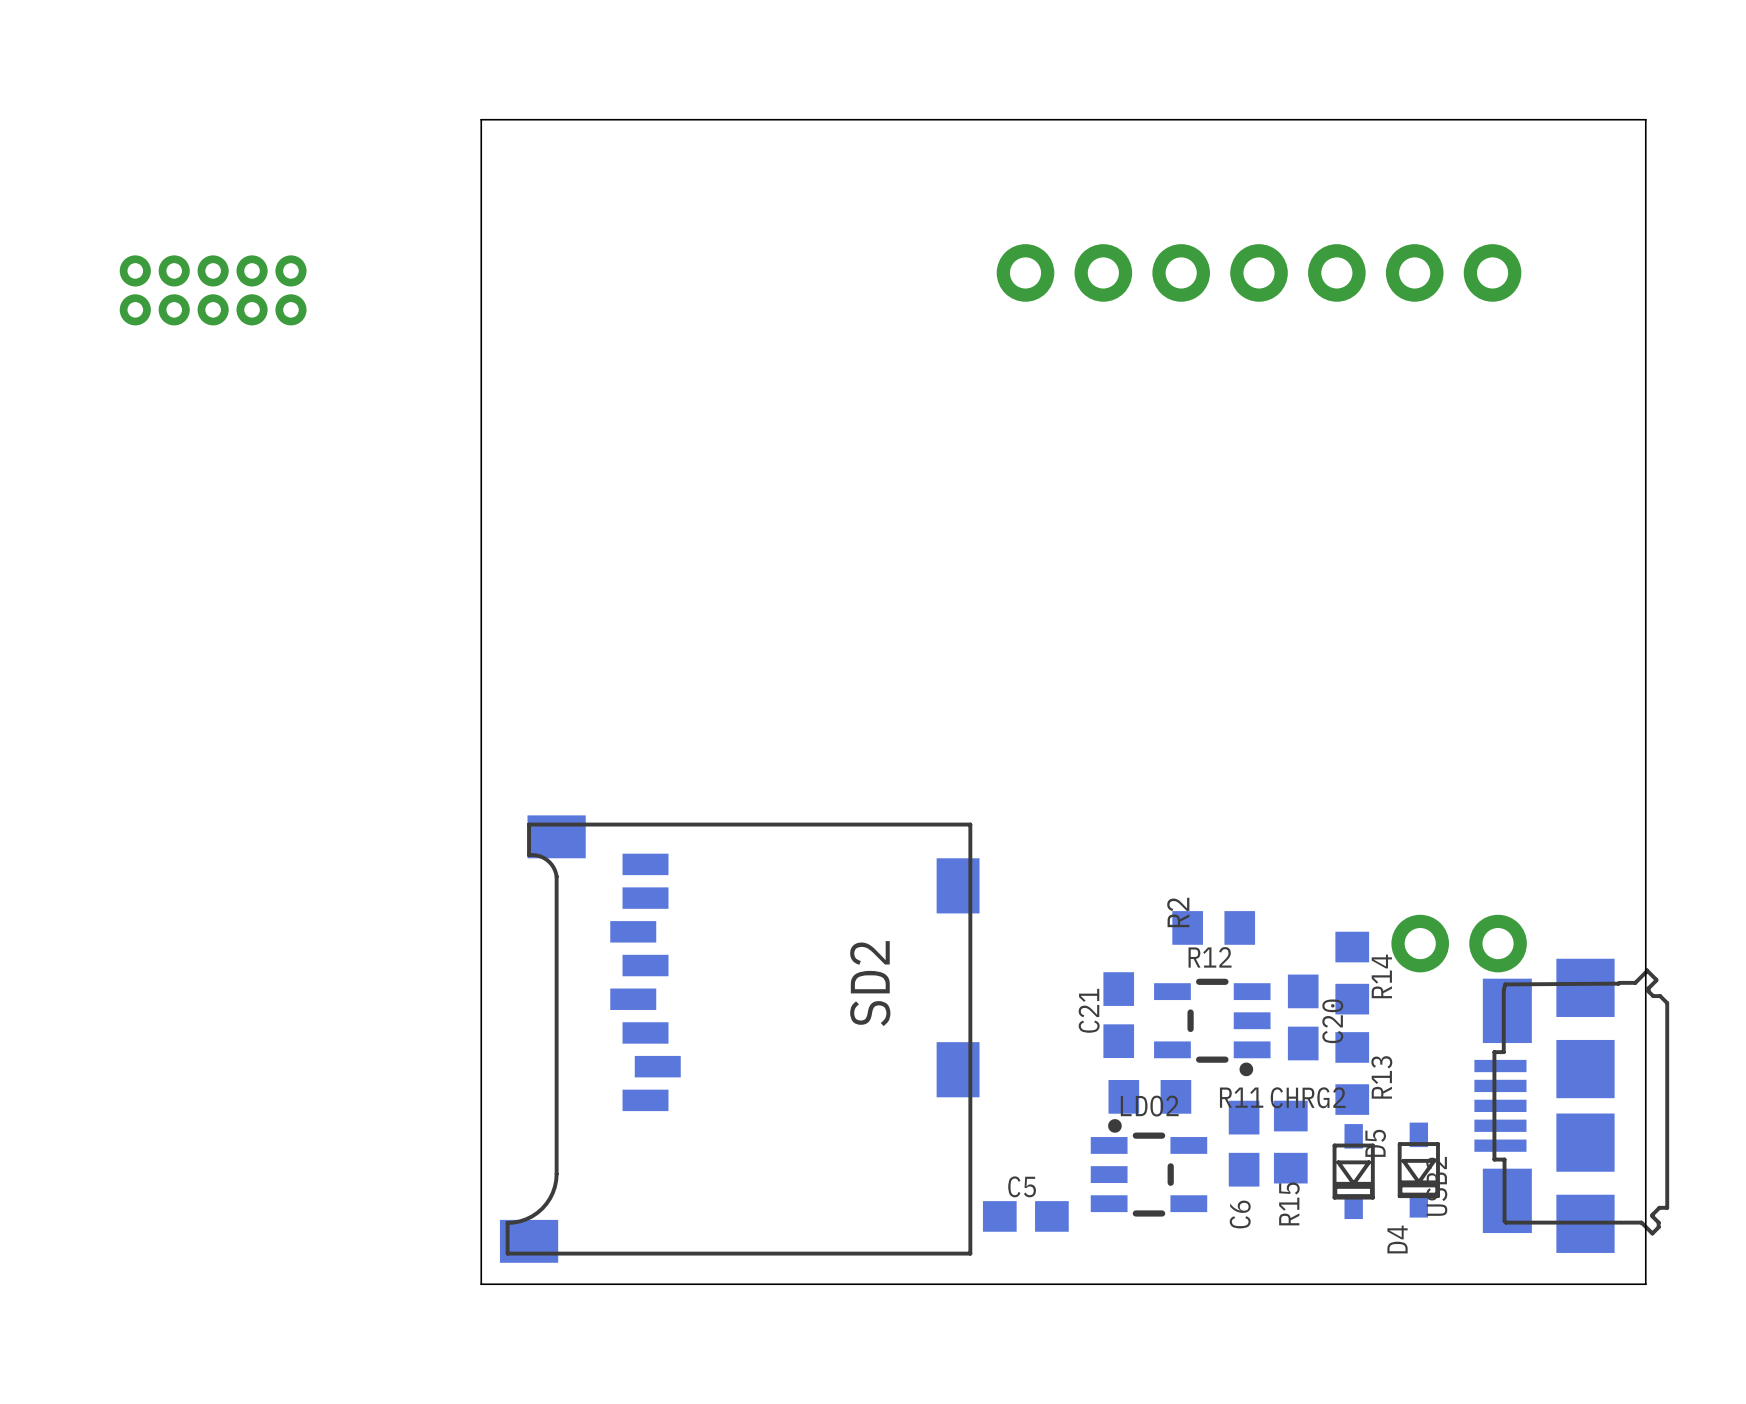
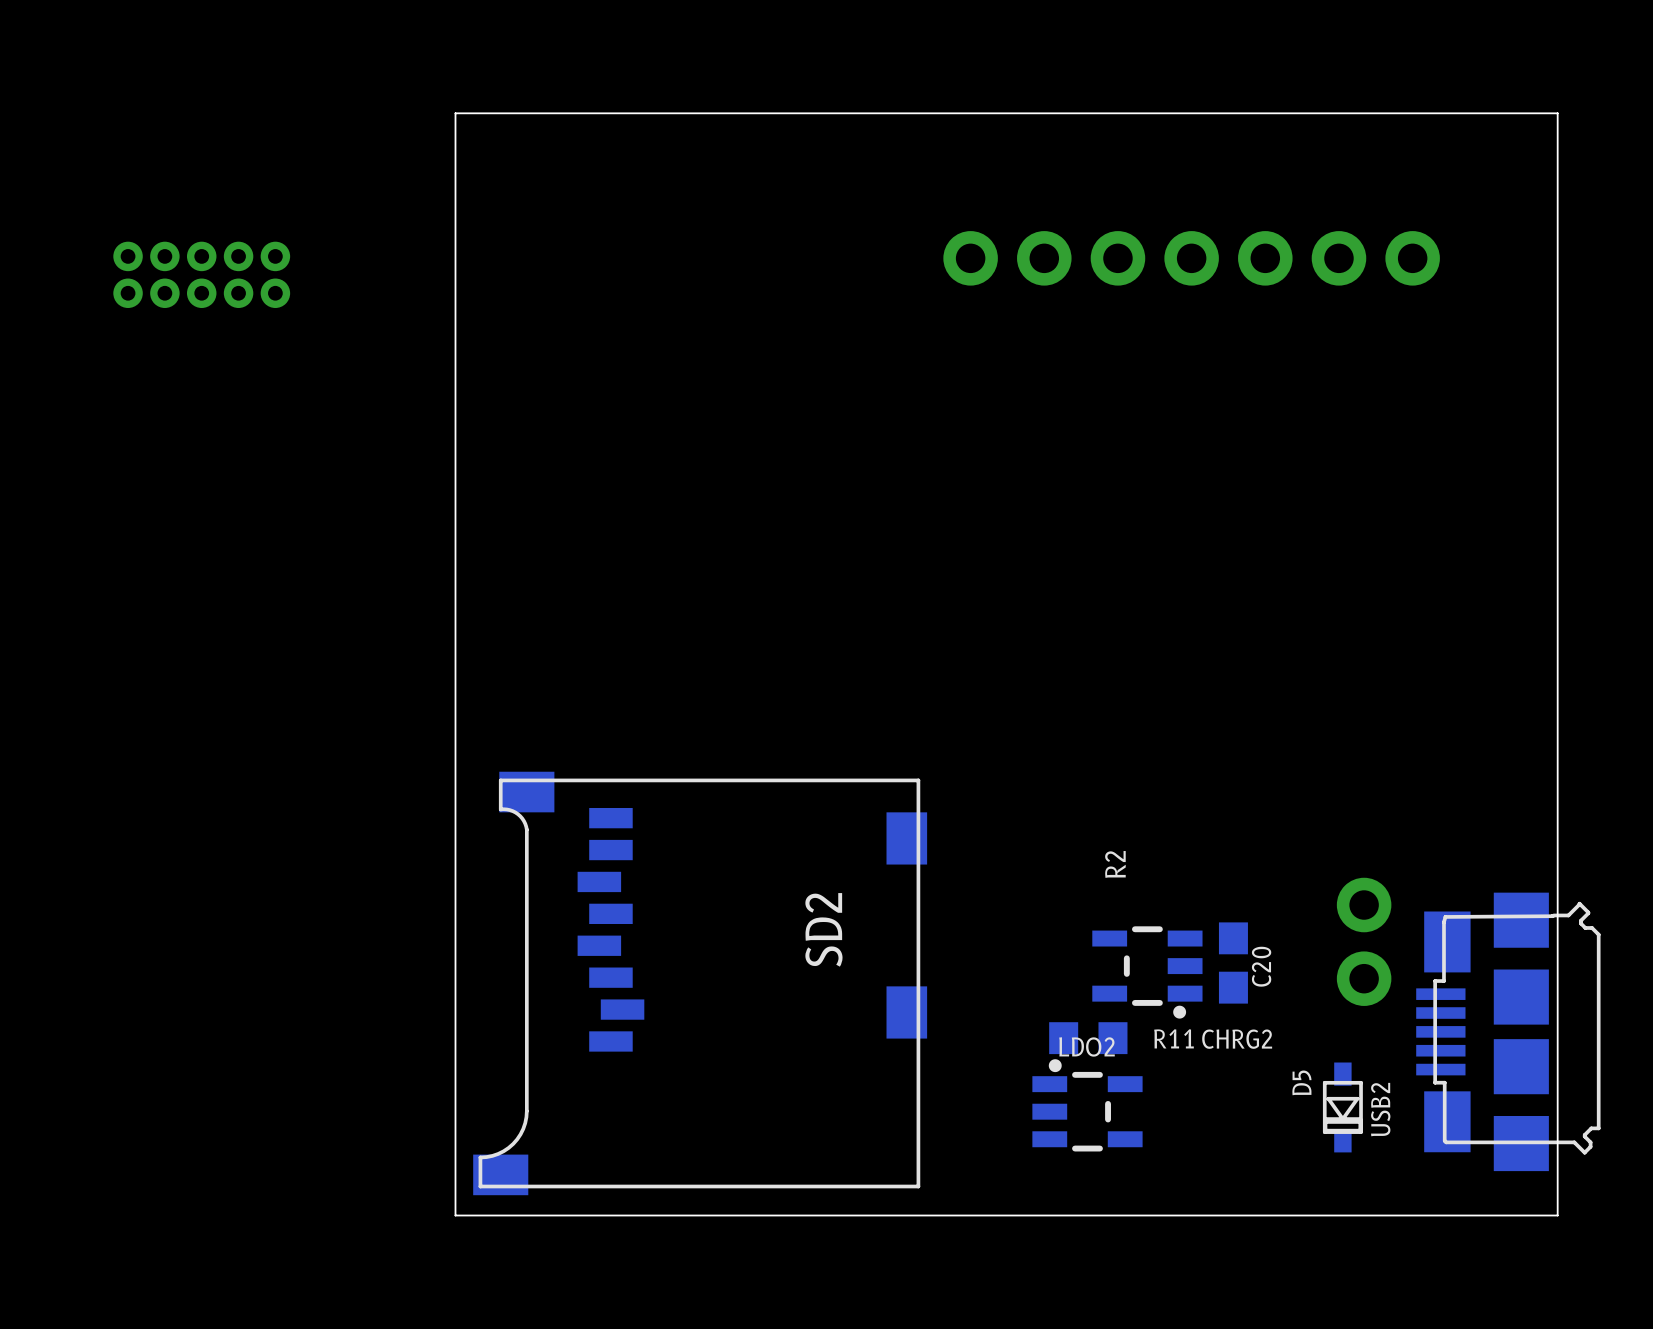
R12: (1213, 927) -> none
part rotation: 0° (1459, 943) -> 90° clockwise (1364, 941)
R14: (1352, 973) -> none
C21: (1118, 1015) -> none
R13: (1352, 1073) -> none
USB2 position: (1571, 1105) -> (1508, 1031)
R15: (1290, 1142) -> none
C6: (1244, 1143) -> none
D4: (1353, 1171) -> none
C5: (1025, 1216) -> none

